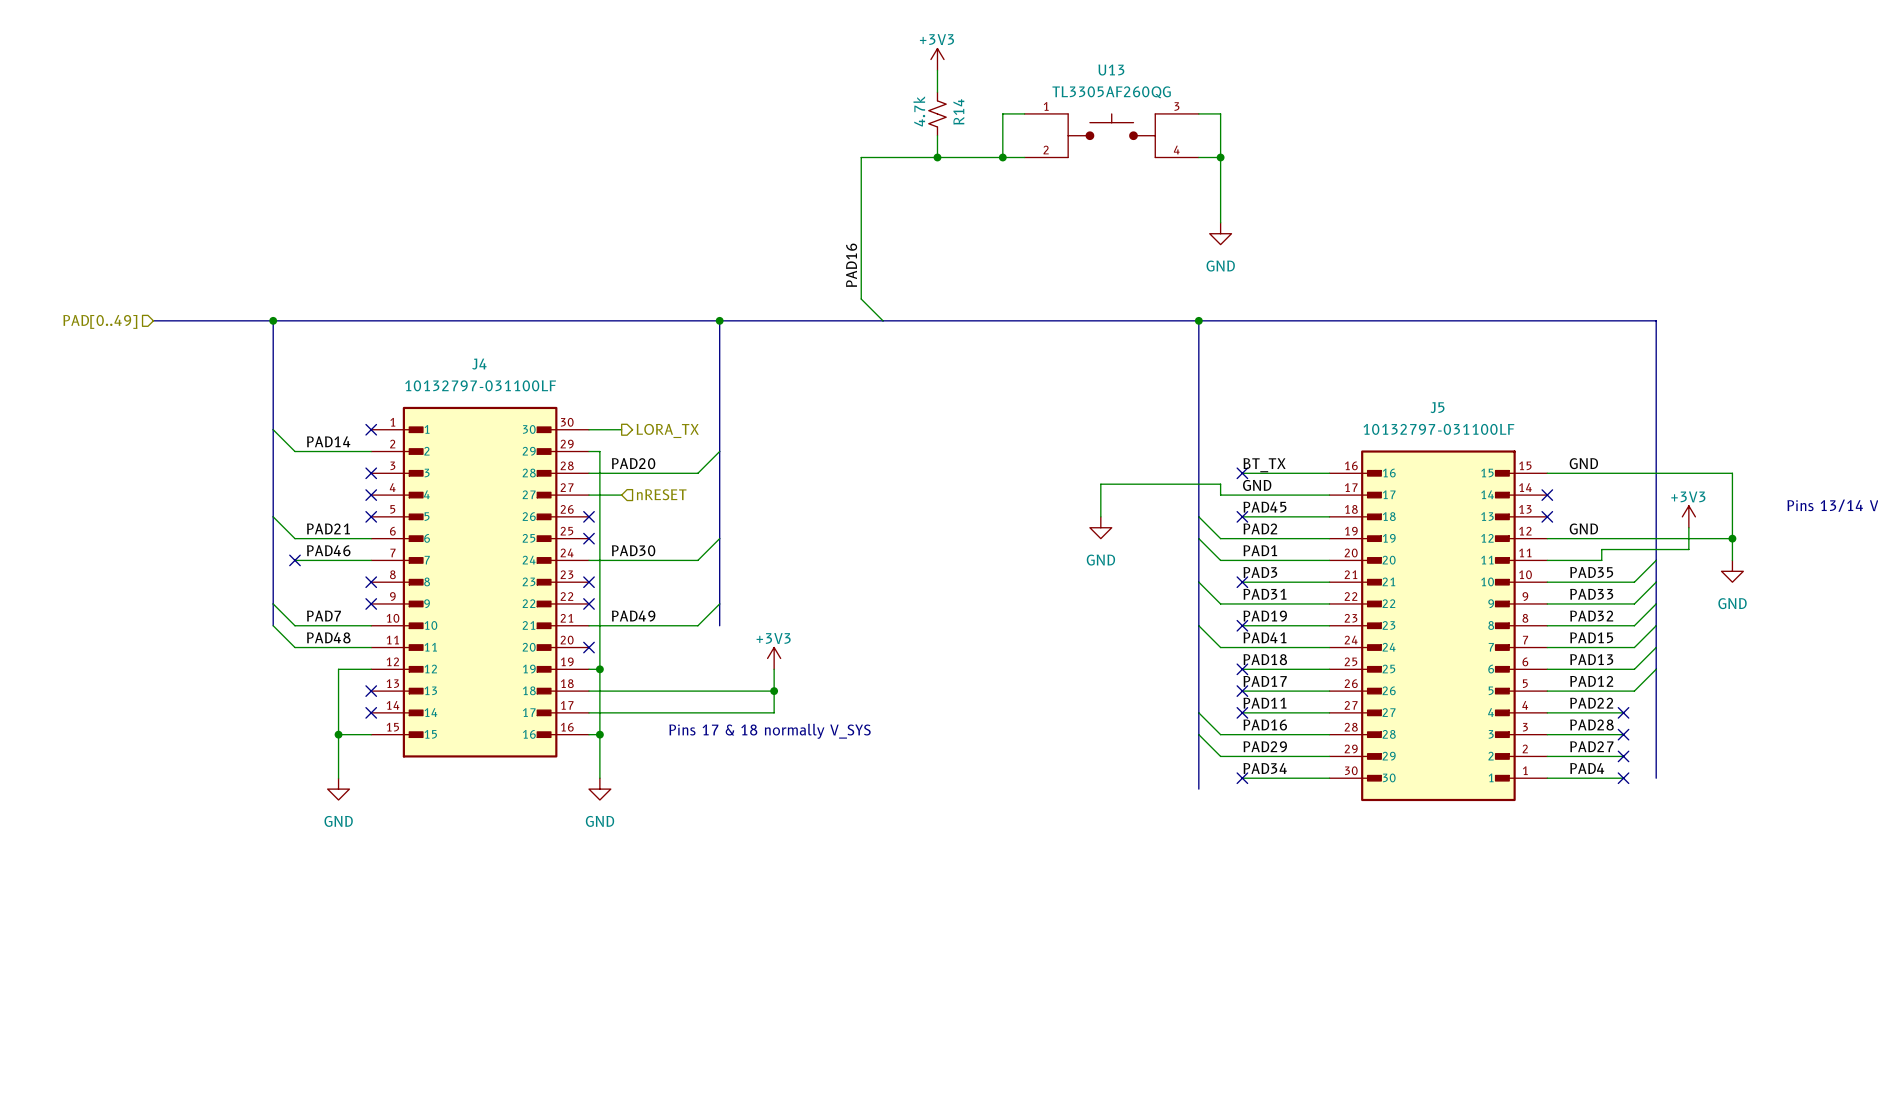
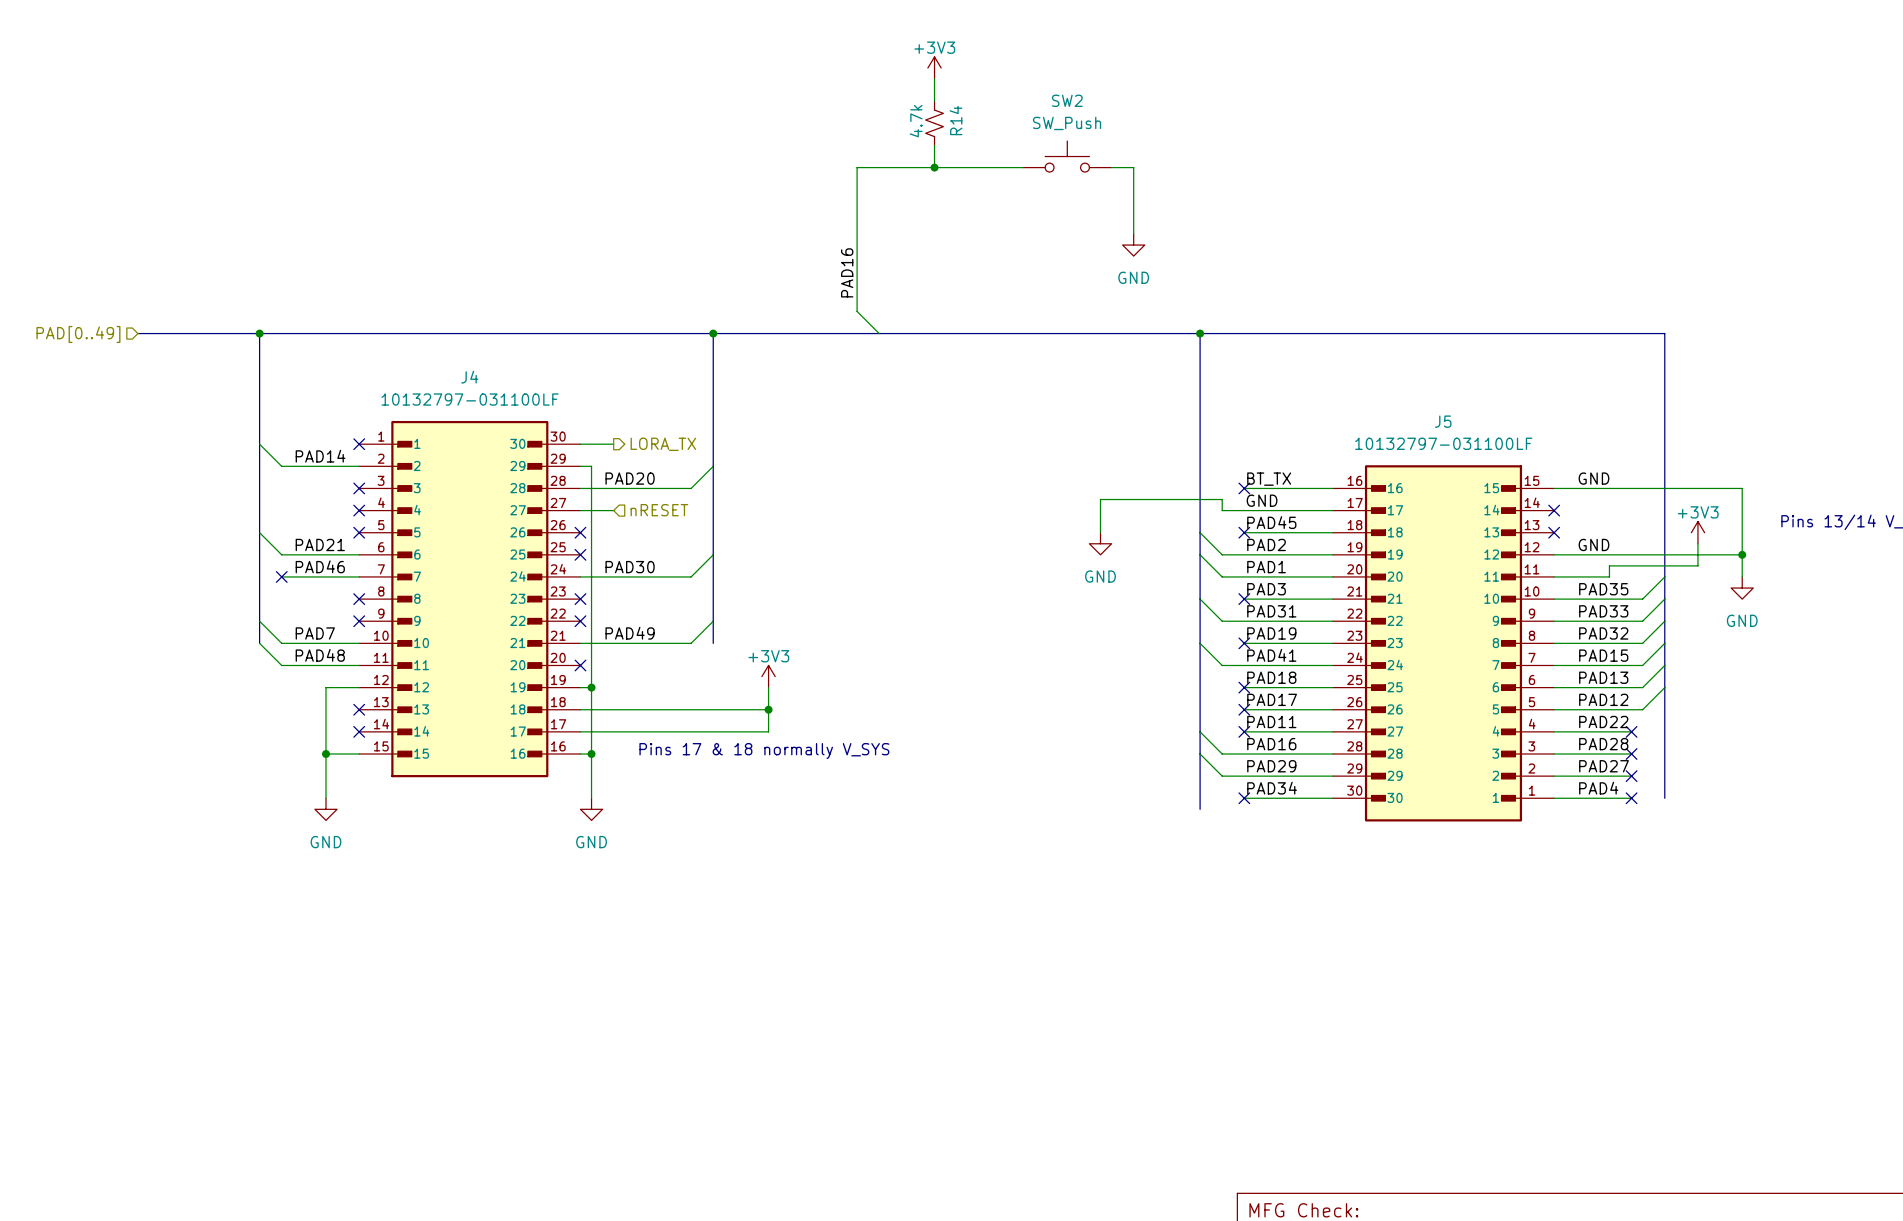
wire: (1024, 113) (1002, 113) (1002, 157) -> none
wire: (1198, 113) (1220, 113) (1220, 222) -> none
U13: TL3305AF260QG (1111, 135) -> none
SW2: none -> SW_Push (1067, 156)
junction: (1002, 157) -> none
wire: none -> (1111, 167) (1133, 167) (1133, 233)
wire: (1198, 157) (1220, 157) -> none
junction: (1220, 157) -> none
power symbol position: GND (1220, 233) -> GND (1133, 245)

